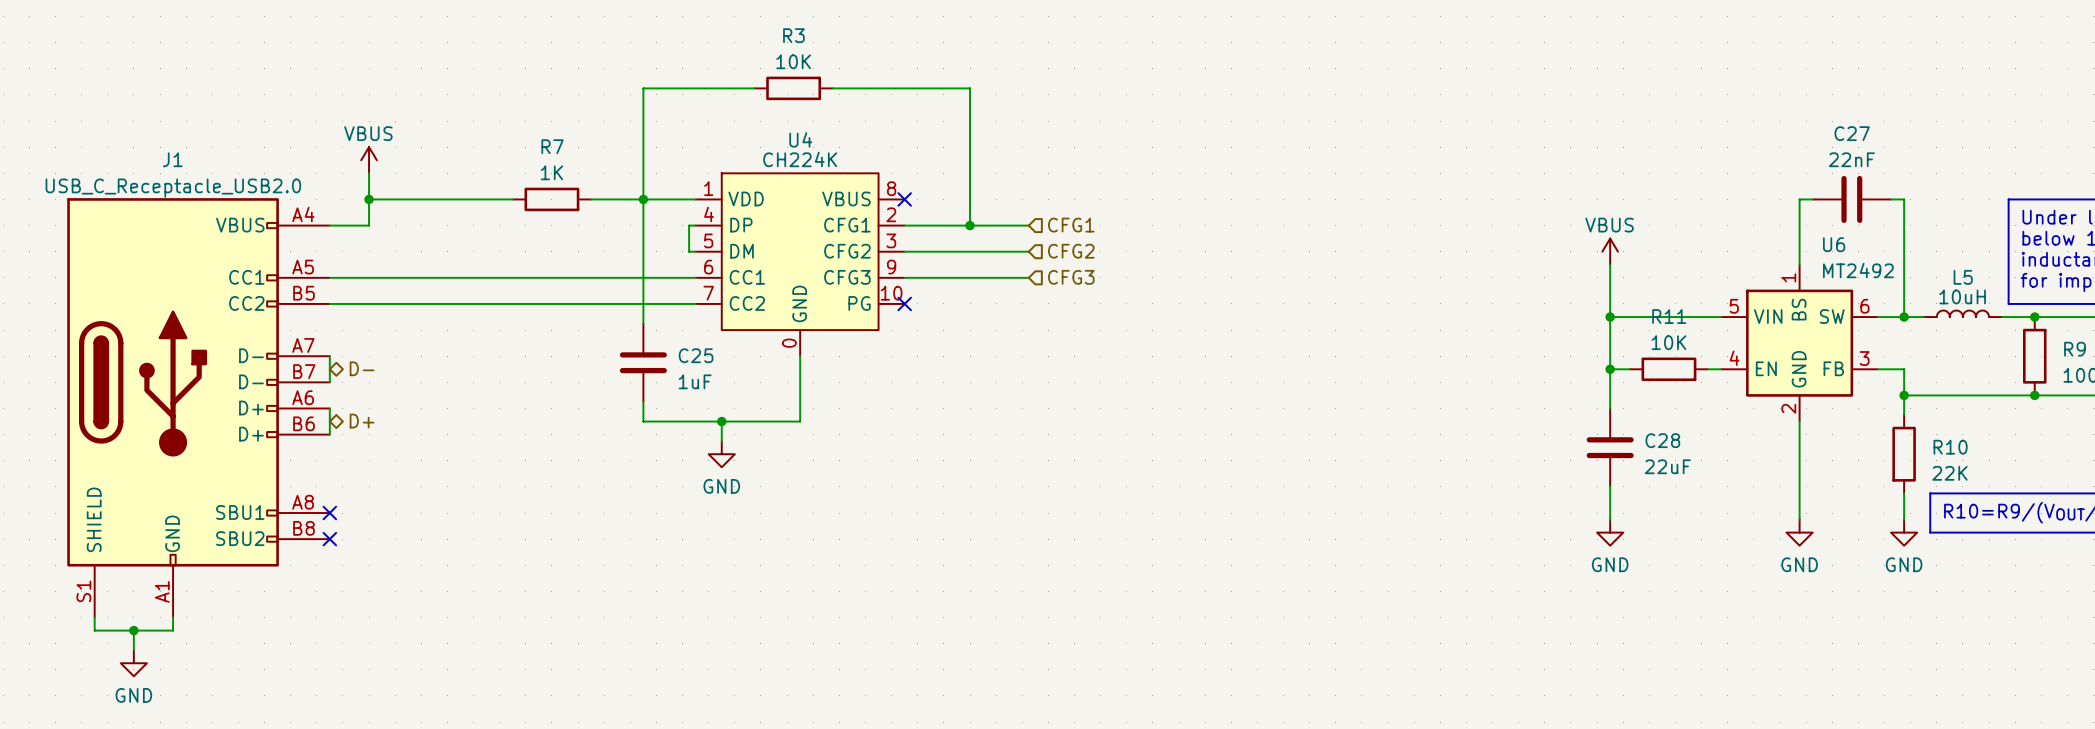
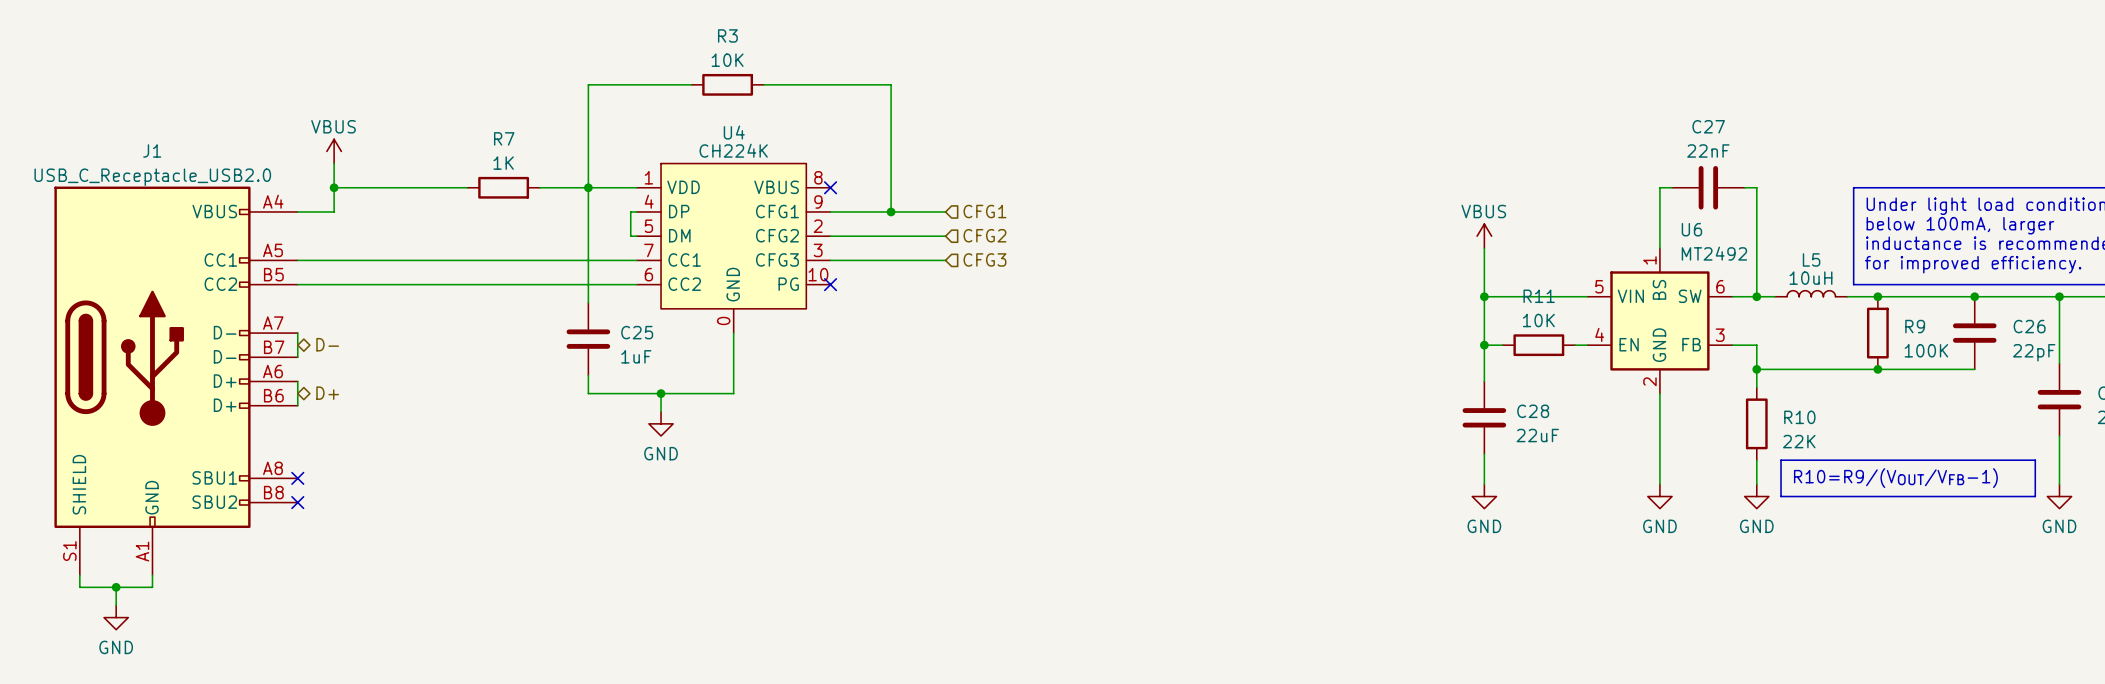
U4 pin number: 2 (891, 214) -> 9 (818, 201)
U4 pin number: 3 (891, 240) -> 2 (818, 226)
U4 pin number: 6 (708, 267) -> 7 (648, 250)
U4 pin number: 9 (891, 267) -> 3 (818, 250)
U4 pin number: 7 (708, 293) -> 6 (648, 274)

